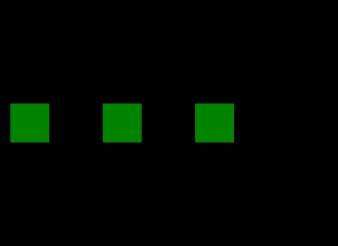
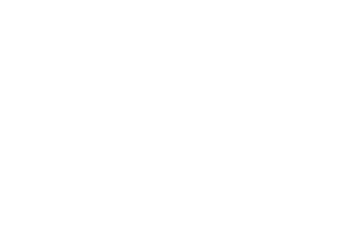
part: (29, 122) -> none
part: (122, 122) -> none
part: (214, 122) -> none

